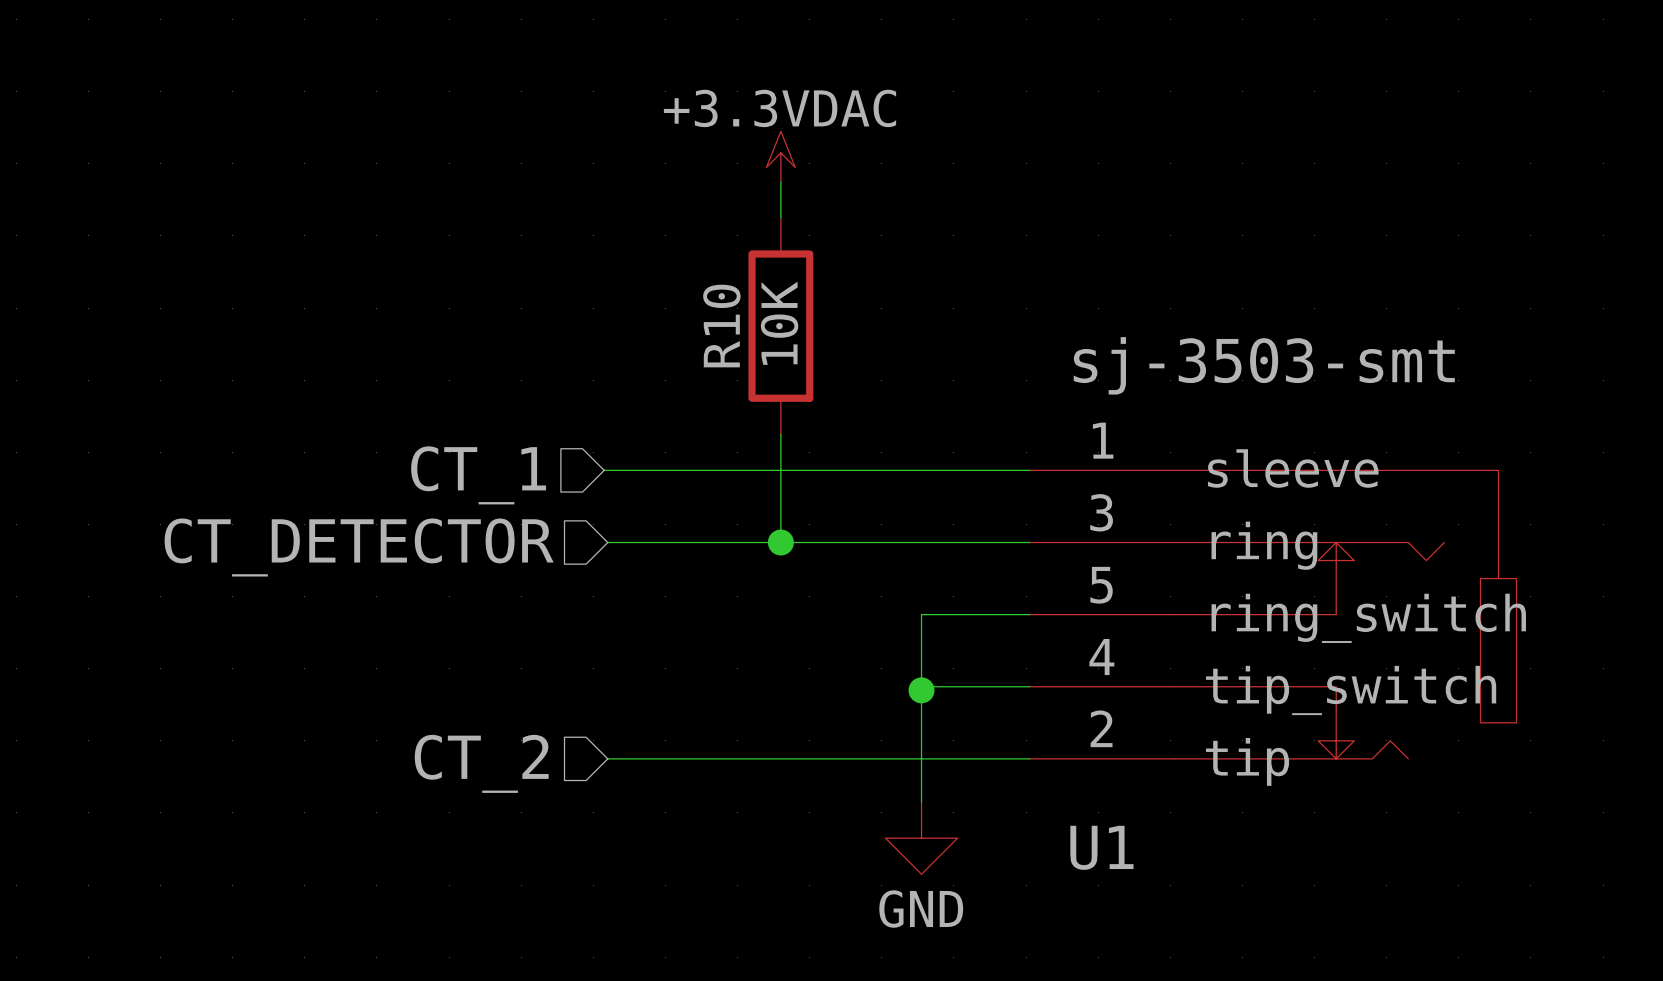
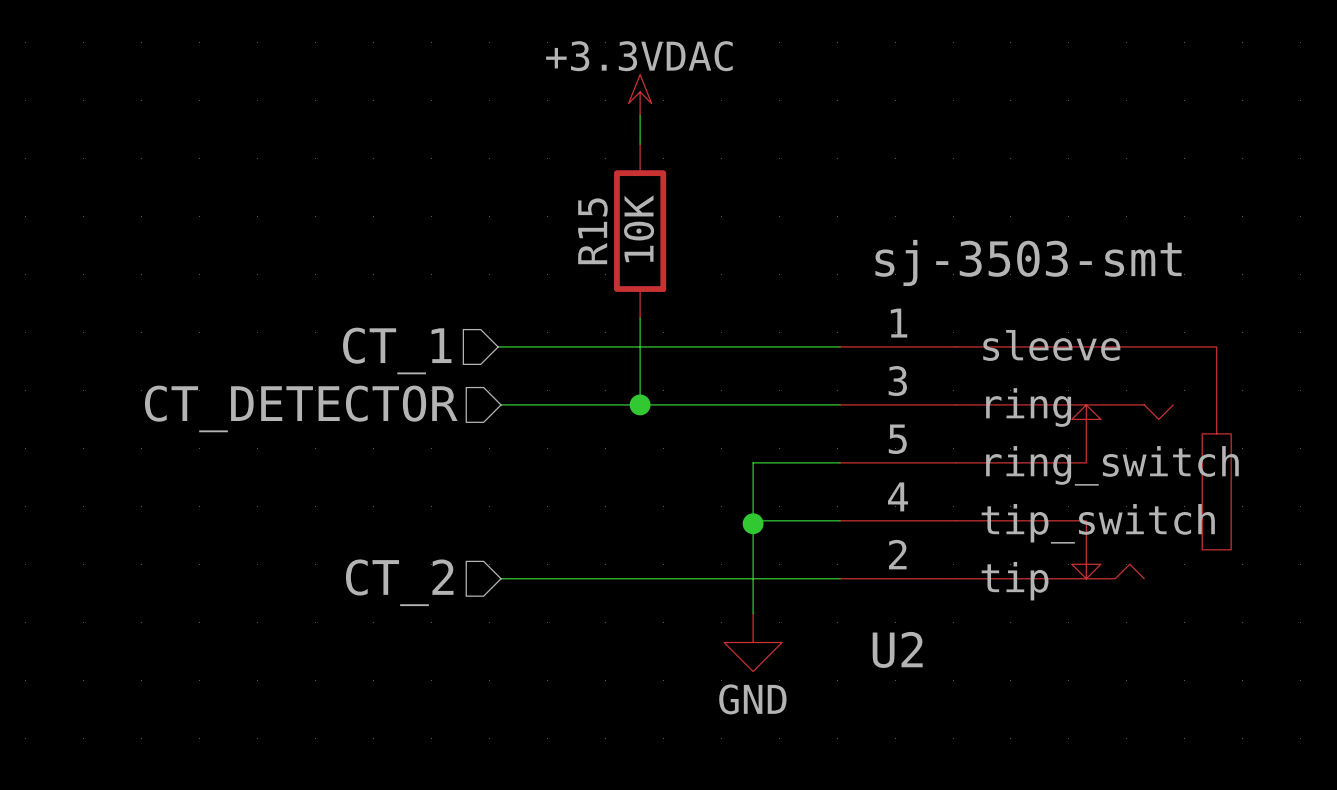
R10 name: R10 (721, 326) -> R15 (592, 231)
U1 name: U1 (1101, 847) -> U2 (897, 649)

